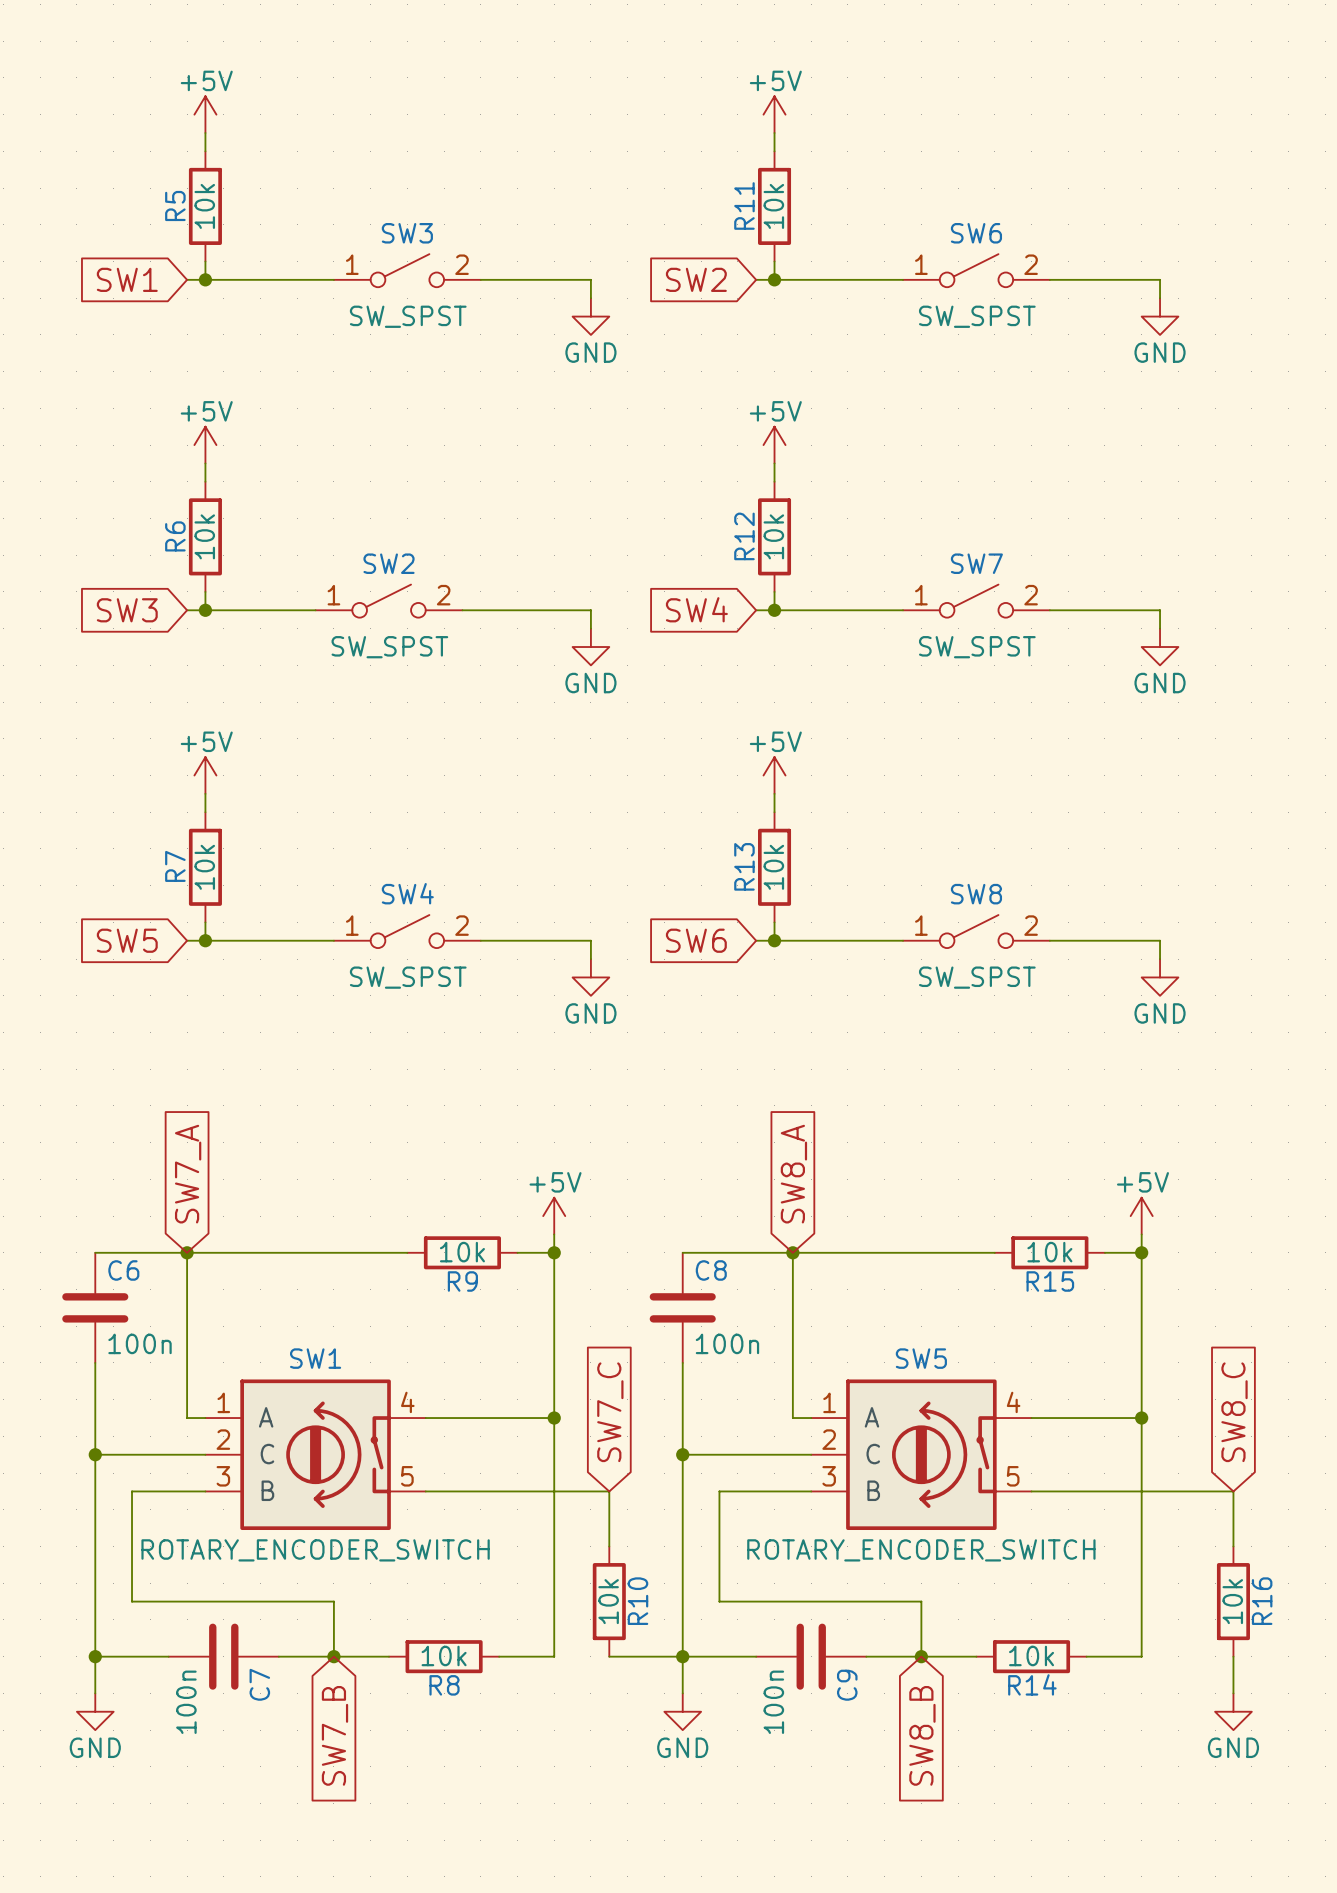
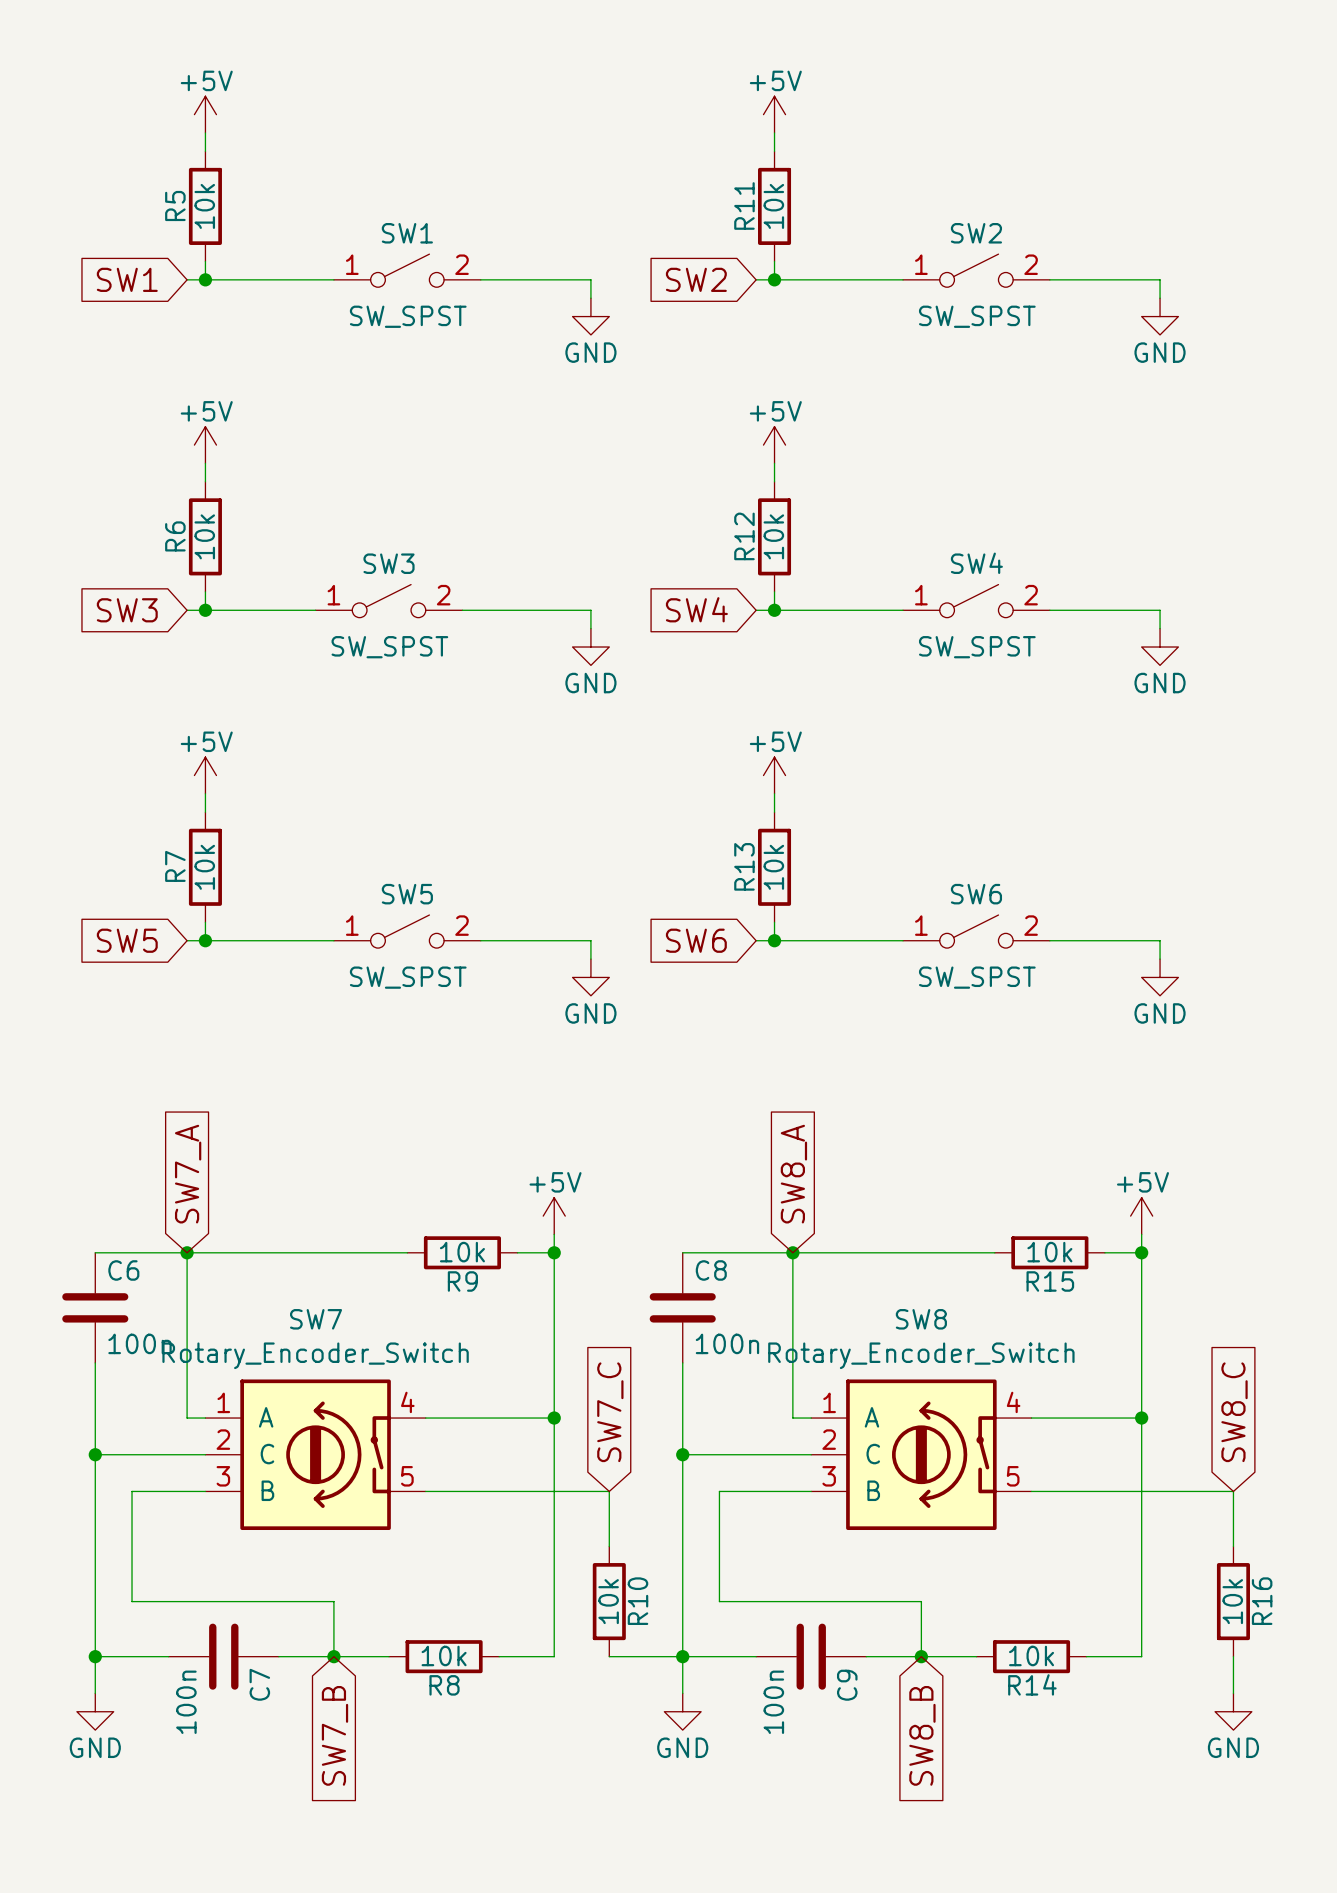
SW3 name: SW3 (407, 233) -> SW1 (407, 233)
SW6 name: SW6 (976, 233) -> SW2 (976, 233)
SW2 name: SW2 (389, 563) -> SW3 (389, 563)
SW7 name: SW7 (976, 563) -> SW4 (976, 563)
SW4 name: SW4 (407, 893) -> SW5 (407, 894)
SW8 name: SW8 (976, 894) -> SW6 (976, 894)
SW1 name: SW1 (315, 1358) -> SW7 (316, 1319)
SW5 name: SW5 (921, 1358) -> SW8 (921, 1319)
SW1 value: ROTARY_ENCODER_SWITCH (315, 1550) -> Rotary_Encoder_Switch (315, 1355)
SW5 value: ROTARY_ENCODER_SWITCH (921, 1550) -> Rotary_Encoder_Switch (921, 1355)

